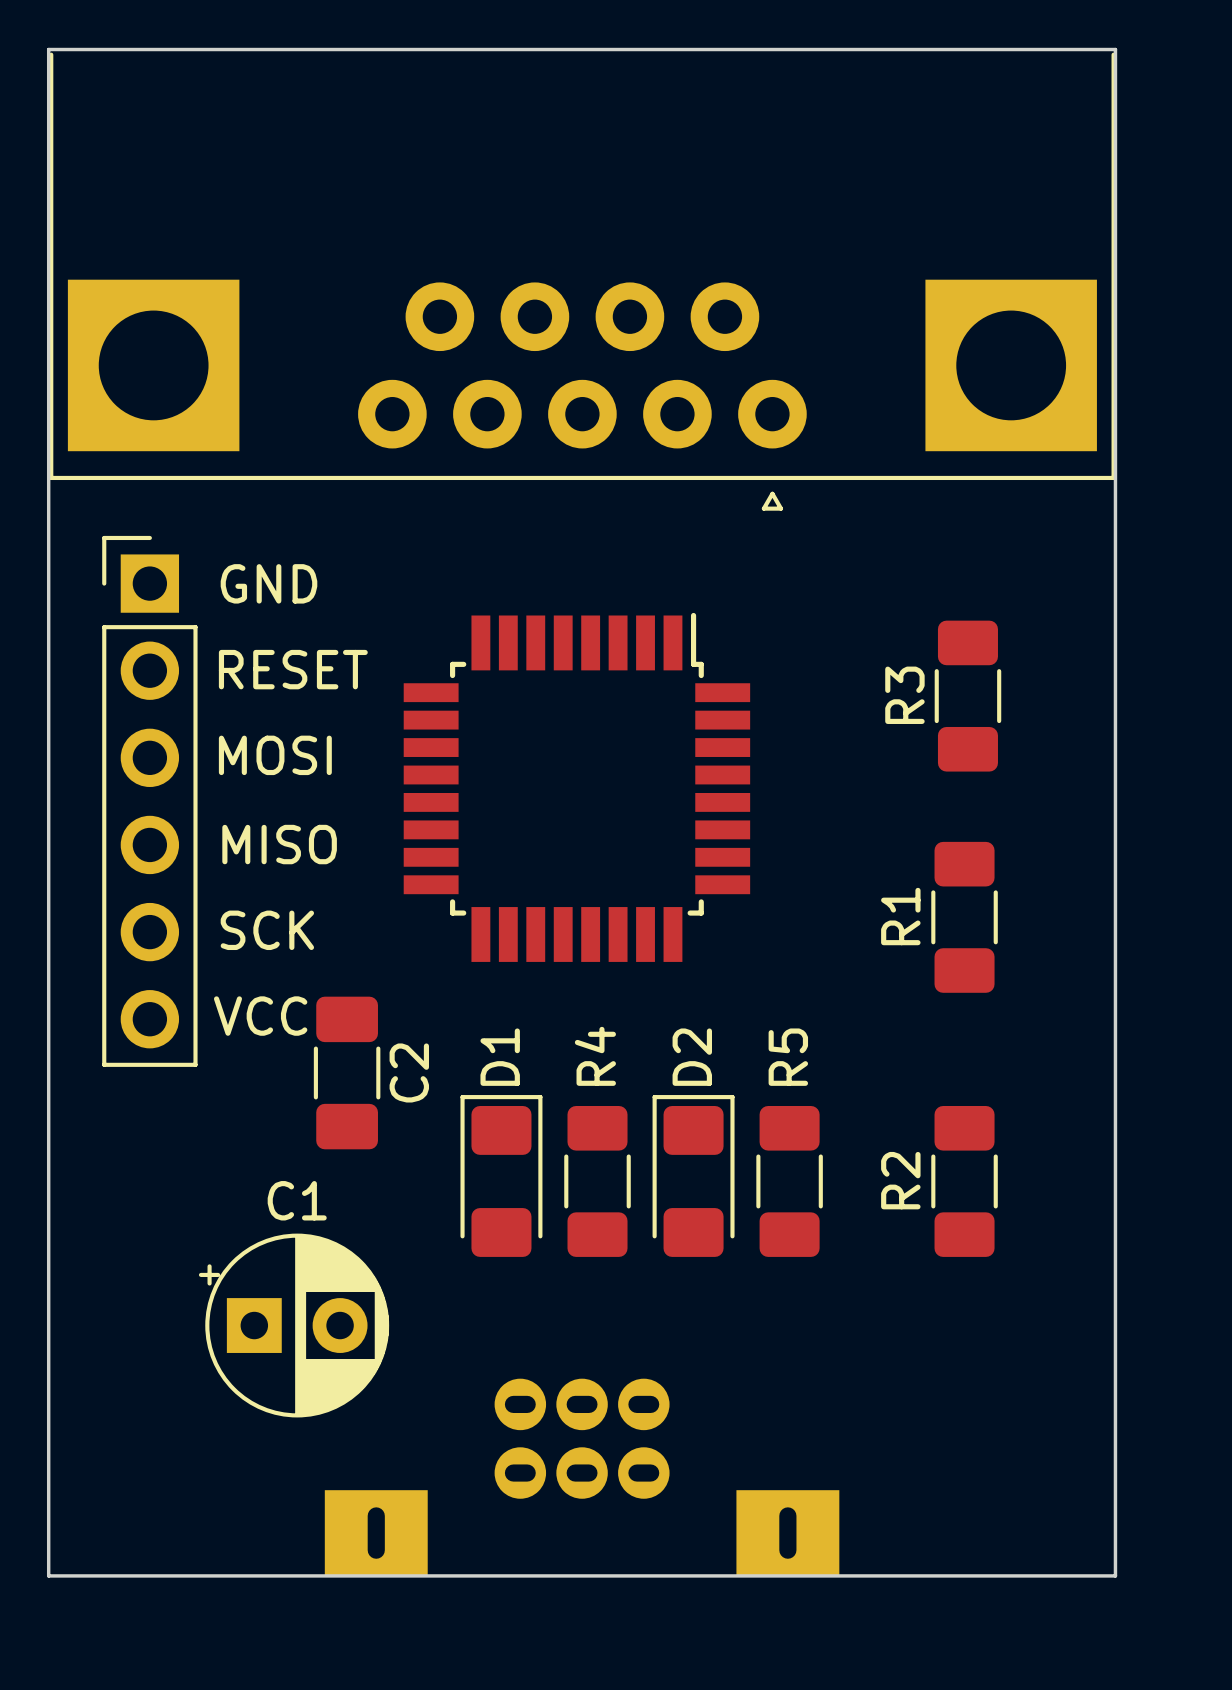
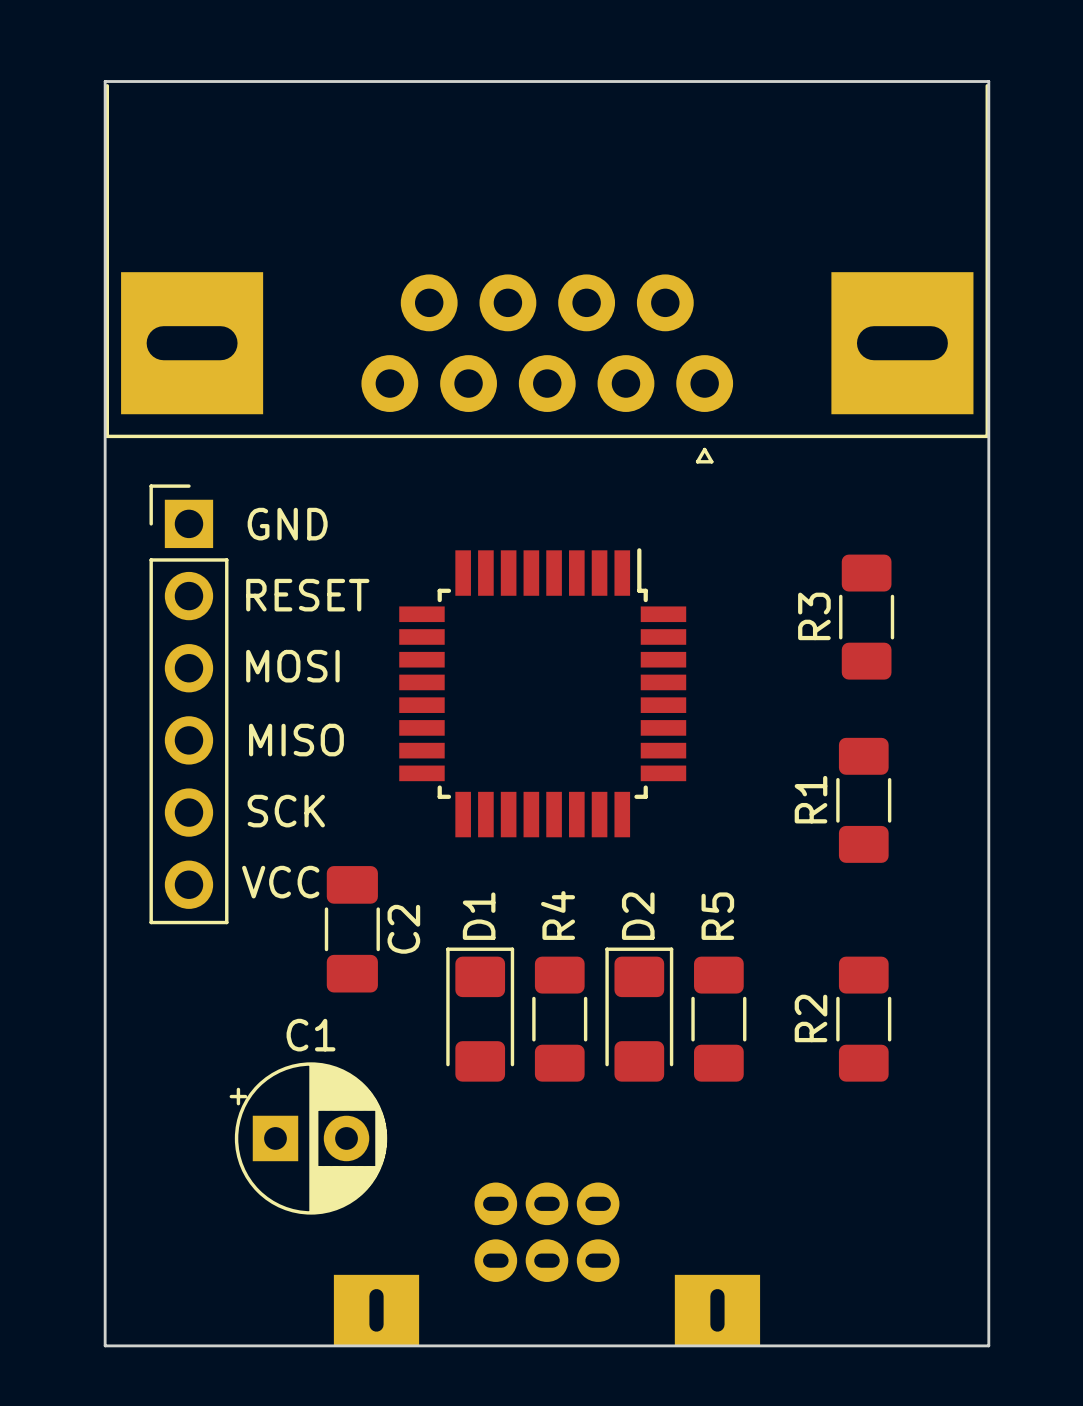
part footprint: [49, 52, 1116, 511] -> [105, 84, 989, 464]

